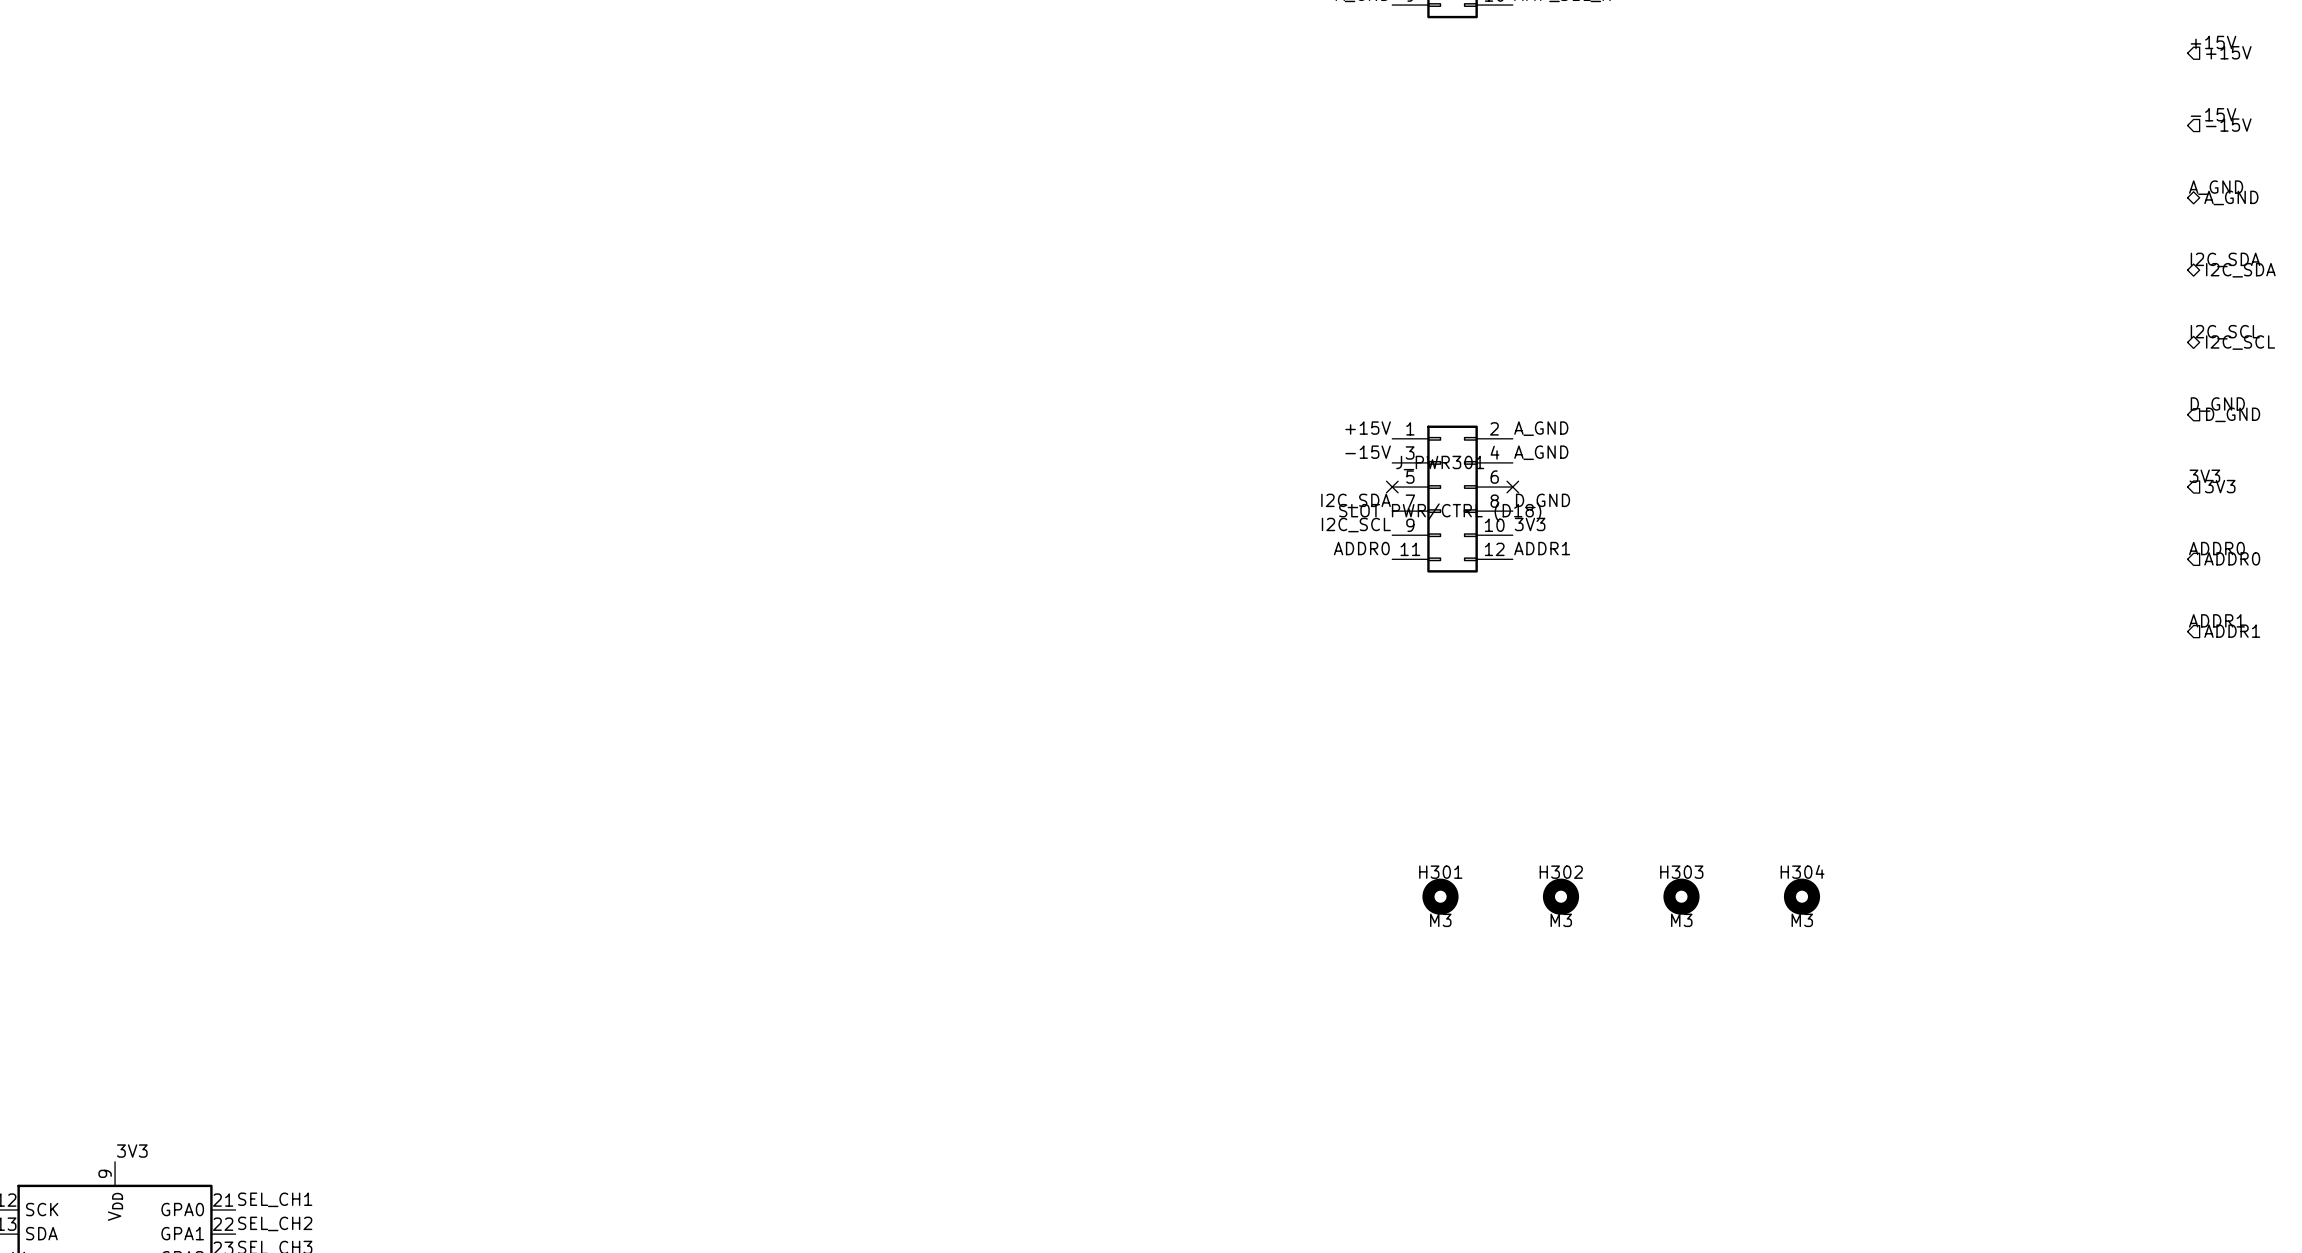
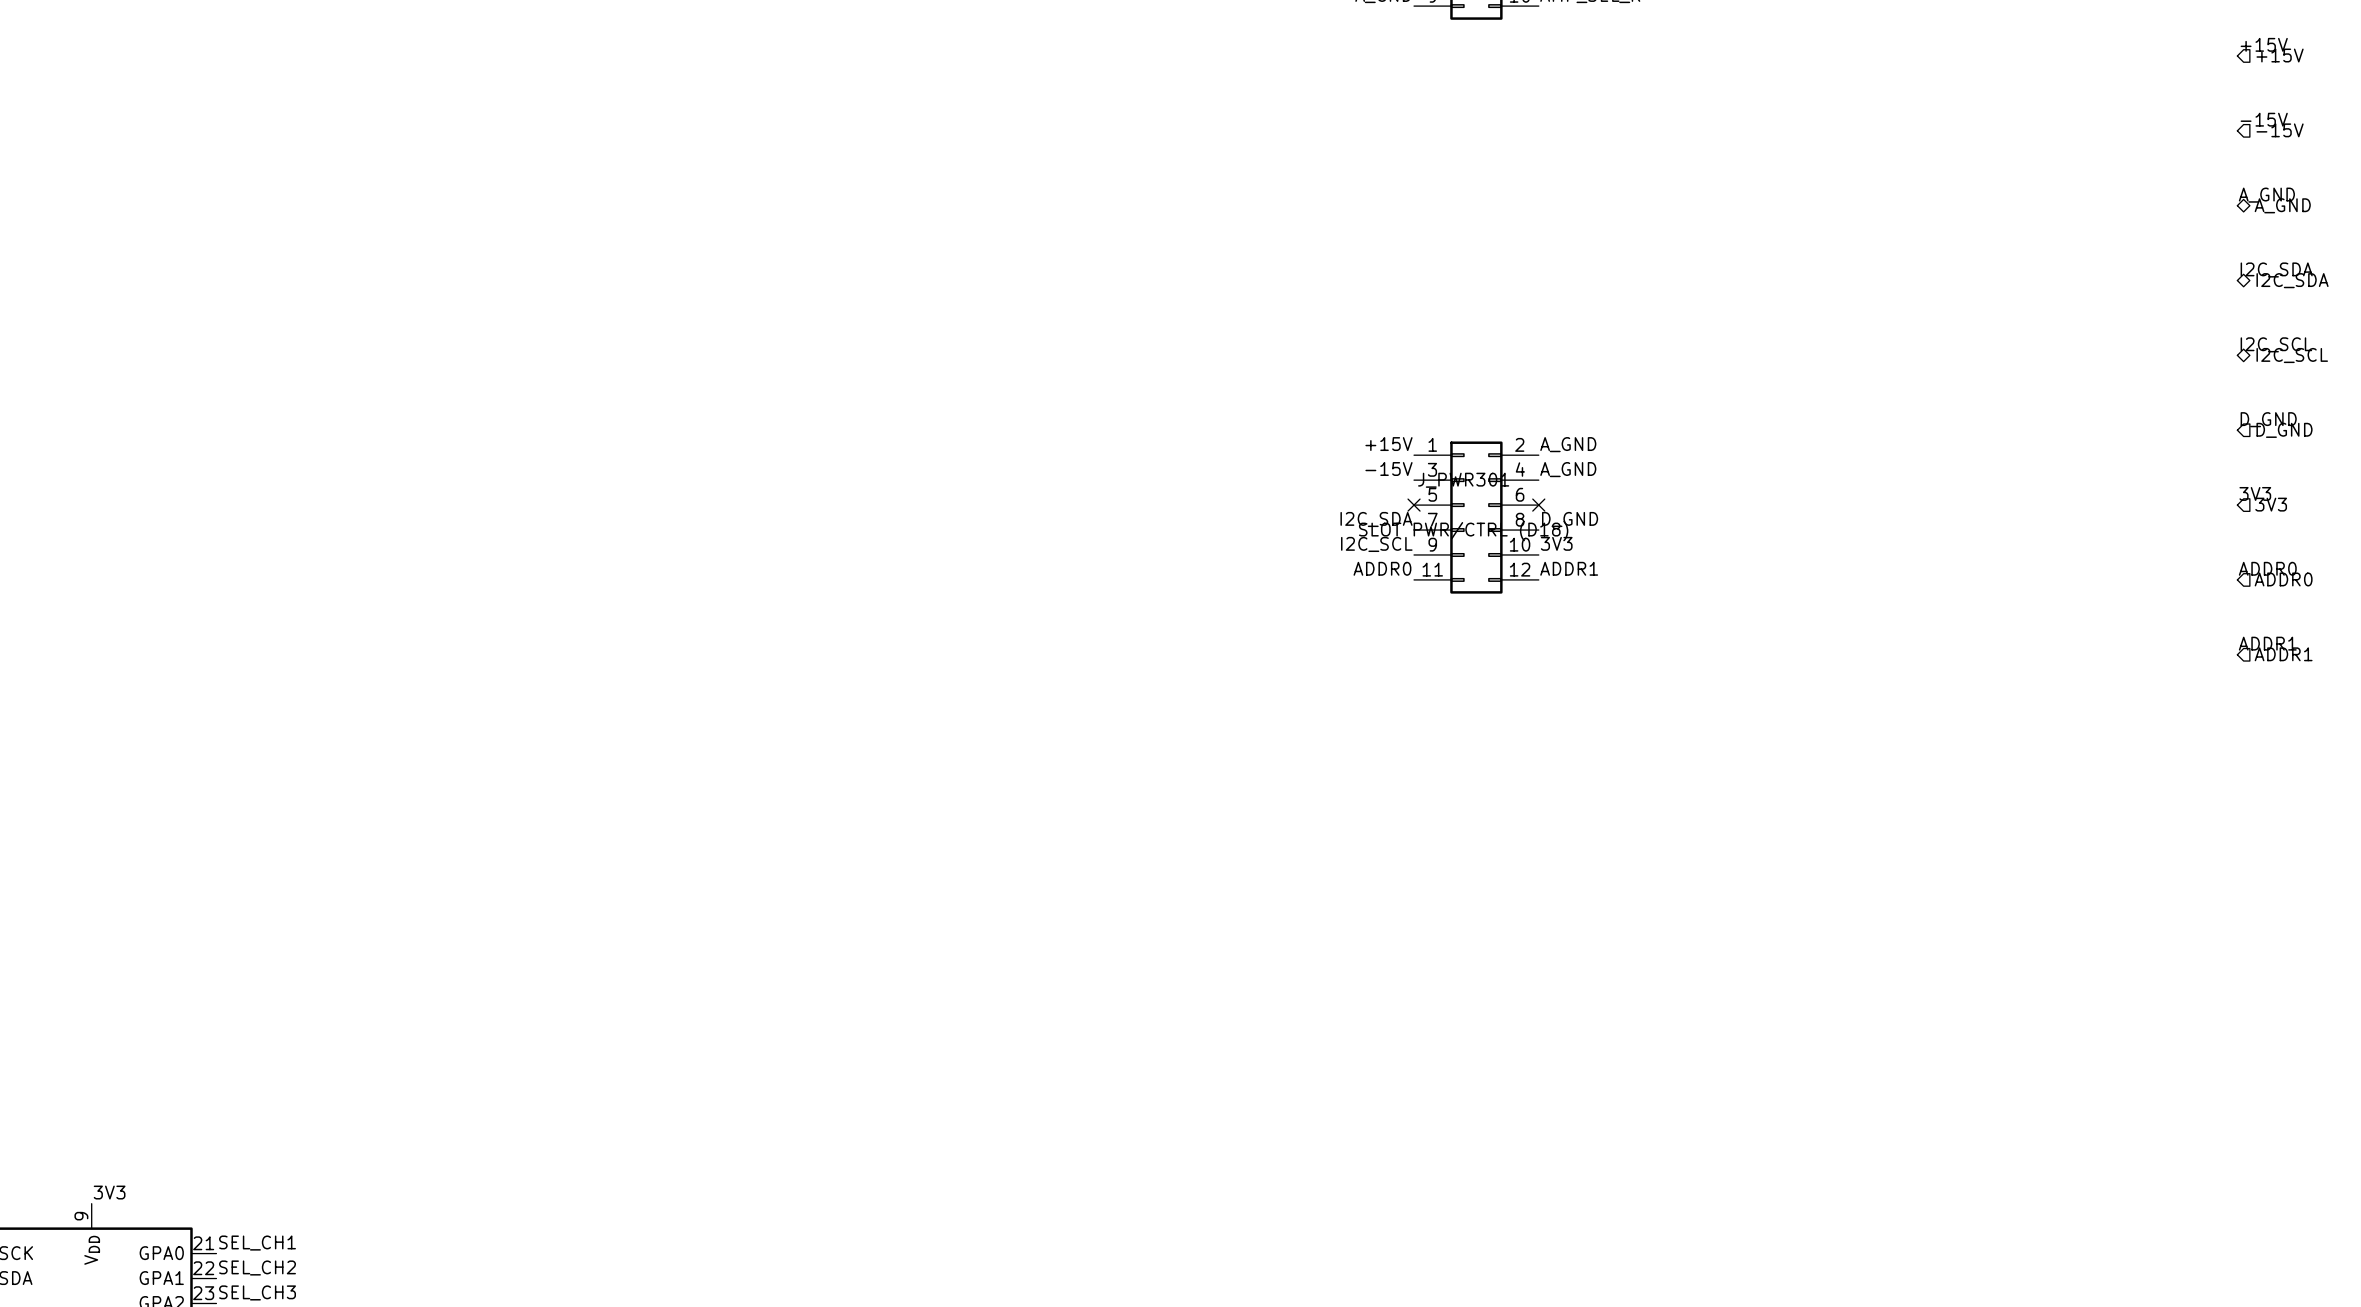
H301: M3 (1440, 896) -> none
H302: M3 (1561, 896) -> none
H303: M3 (1681, 896) -> none
H304: M3 (1801, 896) -> none

